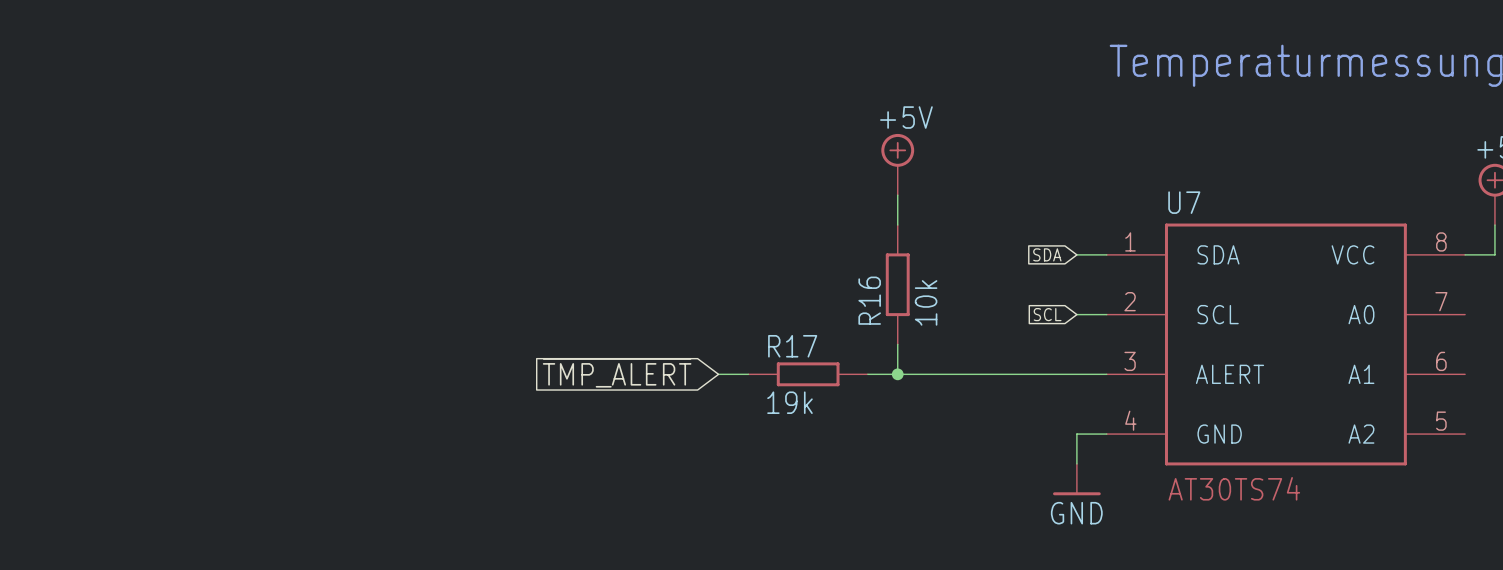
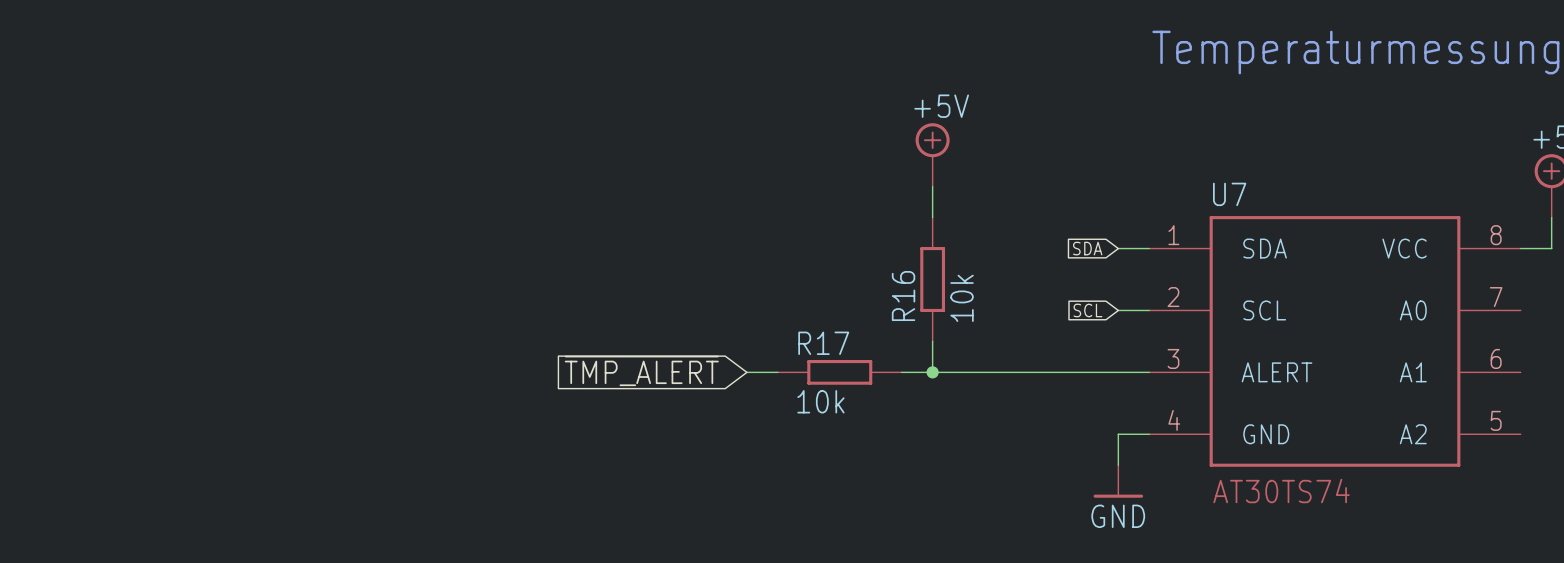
R17 value: 19k (789, 402) -> 10k (820, 401)

